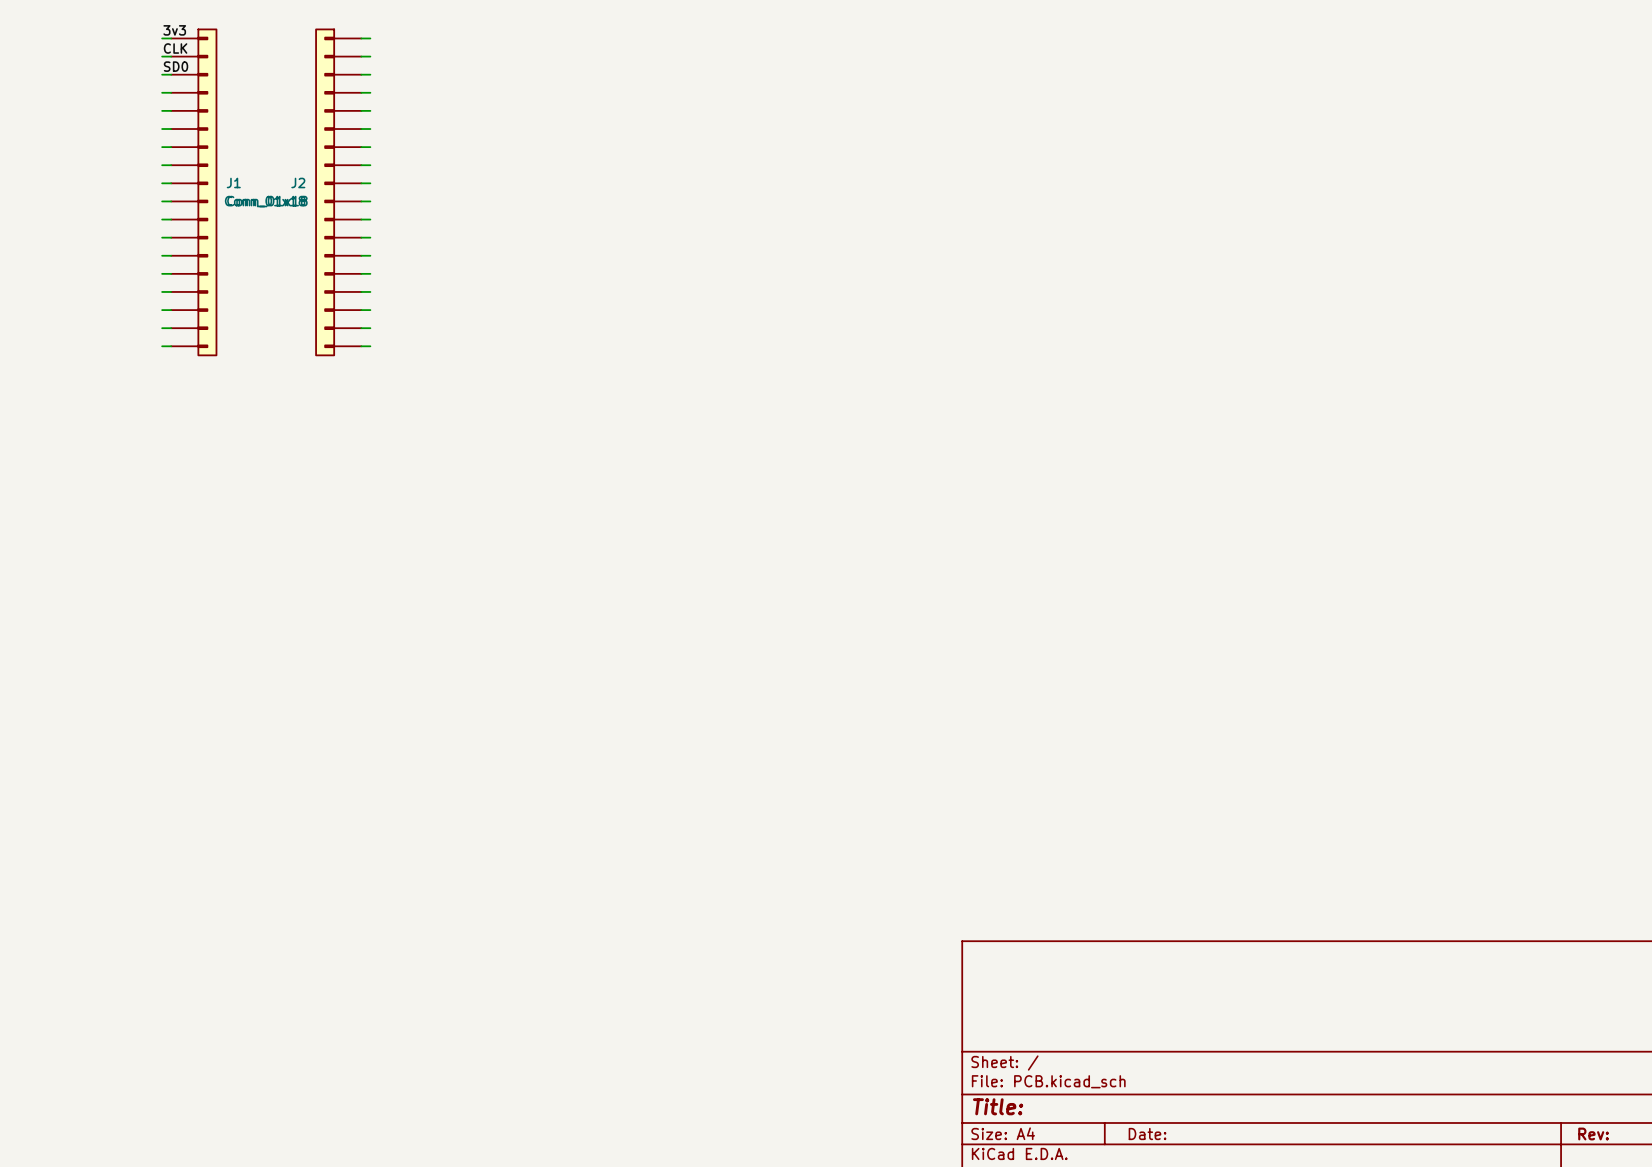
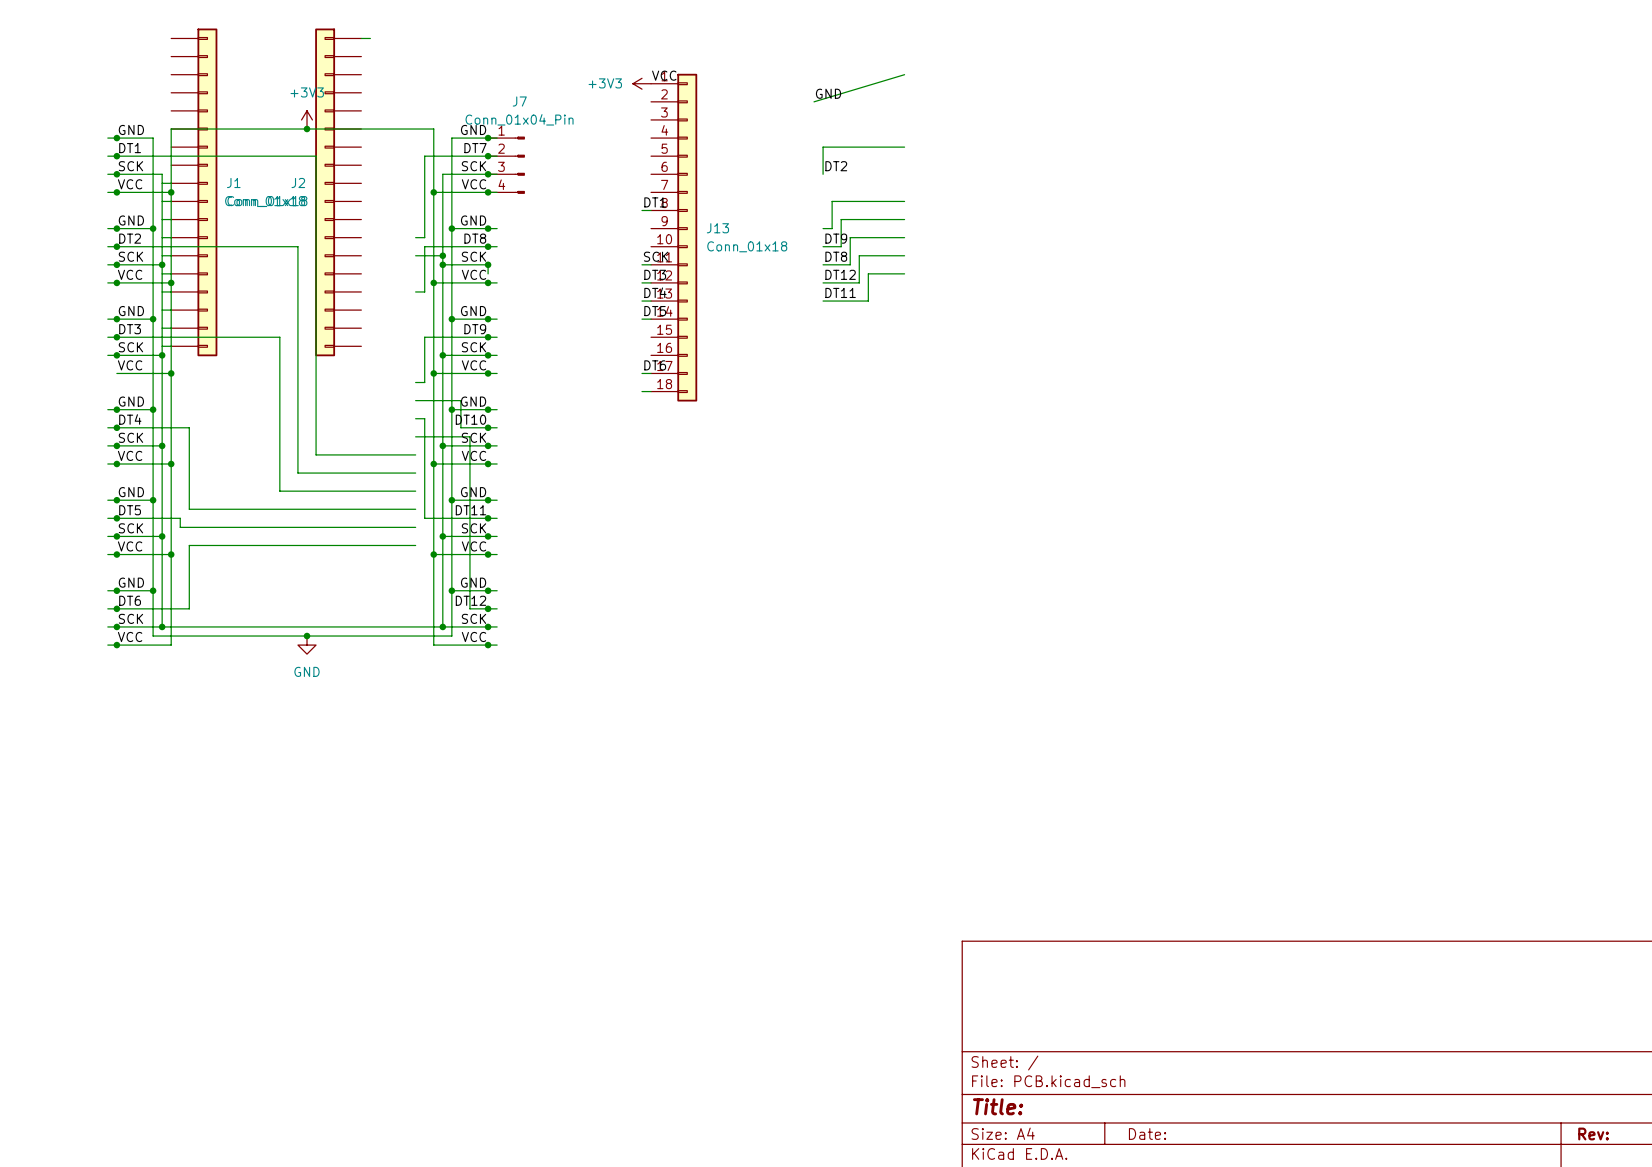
label: 3v3 (174, 30) -> none
wire: (162, 38) (171, 38) -> none
label: CLK (175, 48) -> none
wire: (162, 56) (171, 56) -> none
wire: (361, 56) (370, 56) -> none
label: SD0 (176, 66) -> none
wire: (162, 74) (171, 74) -> none
wire: (361, 74) (370, 74) -> none
wire: none -> (904, 74) (814, 101)
label: none -> VCC (664, 75)
power symbol: none -> +3V3 (641, 83)
wire: (162, 92) (171, 92) -> none
wire: (361, 92) (370, 92) -> none
label: none -> GND (828, 93)
wire: (162, 110) (171, 110) -> none
wire: (361, 110) (370, 110) -> none
power symbol: none -> +3V3 (307, 119)
label: none -> GND (131, 129)
wire: (162, 129) (171, 129) -> none
junction: none -> (307, 129)
wire: none -> (361, 129) (171, 129) (171, 645) (107, 645)
wire: none -> (370, 129) (433, 129) (433, 645) (497, 645)
label: none -> GND (473, 129)
wire: none -> (107, 138) (153, 138) (153, 636) (451, 636) (451, 138) (497, 138)
junction: none -> (116, 138)
junction: none -> (488, 138)
wire: (162, 147) (171, 147) -> none
wire: (361, 147) (370, 147) -> none
wire: none -> (904, 147) (823, 147) (823, 174)
label: none -> DT1 (130, 148)
label: none -> DT7 (475, 148)
wire: none -> (107, 156) (316, 156) (316, 454) (415, 454)
junction: none -> (116, 156)
junction: none -> (488, 156)
wire: none -> (497, 156) (424, 156) (424, 237) (415, 237)
wire: (162, 165) (171, 165) -> none
wire: (361, 165) (370, 165) -> none
J7: none -> Conn_01x04_Pin (506, 165)
label: none -> SCK (130, 166)
label: none -> SCK (474, 166)
label: none -> DT2 (836, 166)
wire: none -> (107, 174) (162, 174) (162, 626)
junction: none -> (116, 174)
junction: none -> (488, 174)
wire: none -> (497, 174) (442, 174) (442, 626)
wire: (361, 183) (370, 183) -> none
label: none -> VCC (130, 184)
label: none -> VCC (474, 184)
wire: none -> (107, 192) (171, 192)
junction: none -> (116, 192)
junction: none -> (171, 192)
wire: none -> (433, 192) (497, 192)
junction: none -> (433, 192)
junction: none -> (488, 192)
wire: (361, 201) (370, 201) -> none
wire: none -> (904, 201) (832, 201) (832, 228) (823, 228)
label: none -> DT1 (655, 202)
wire: none -> (641, 210) (651, 210)
wire: (361, 219) (370, 219) -> none
wire: none -> (904, 219) (841, 219) (841, 246) (823, 246)
label: none -> GND (131, 220)
label: none -> GND (473, 220)
wire: none -> (107, 228) (153, 228)
junction: none -> (116, 228)
junction: none -> (153, 228)
wire: none -> (451, 228) (497, 228)
junction: none -> (451, 228)
junction: none -> (488, 228)
wire: (361, 237) (370, 237) -> none
J13: none -> Conn_01x18 (674, 237)
wire: none -> (904, 237) (850, 237) (850, 264) (823, 264)
label: none -> DT2 (130, 238)
label: none -> DT8 (475, 238)
label: none -> DT9 (836, 238)
wire: none -> (107, 246) (297, 246) (297, 473) (415, 473)
junction: none -> (116, 246)
junction: none -> (488, 246)
wire: none -> (497, 246) (424, 246) (424, 291) (415, 291)
wire: (361, 255) (370, 255) -> none
wire: none -> (415, 255) (442, 255)
junction: none -> (442, 255)
wire: none -> (904, 255) (859, 255) (859, 282) (823, 282)
label: none -> SCK (130, 256)
label: none -> SCK (474, 256)
label: none -> SCK (656, 256)
label: none -> DT8 (836, 256)
wire: none -> (107, 264) (162, 264)
junction: none -> (116, 264)
junction: none -> (162, 264)
wire: none -> (442, 264) (488, 264) (488, 273)
junction: none -> (442, 264)
junction: none -> (488, 264)
wire: none -> (641, 264) (651, 264)
wire: (361, 273) (370, 273) -> none
wire: none -> (904, 273) (868, 273) (868, 301) (823, 301)
label: none -> VCC (130, 274)
label: none -> VCC (474, 274)
label: none -> DT3 (655, 274)
label: none -> DT12 (840, 274)
wire: none -> (107, 282) (171, 282)
junction: none -> (116, 282)
junction: none -> (171, 282)
wire: none -> (433, 282) (497, 282)
junction: none -> (433, 282)
junction: none -> (488, 282)
wire: none -> (641, 282) (651, 282)
wire: (361, 291) (370, 291) -> none
label: none -> DT4 (655, 292)
label: none -> DT11 (840, 292)
wire: none -> (641, 301) (651, 301)
wire: (361, 310) (370, 310) -> none
label: none -> GND (131, 311)
label: none -> GND (473, 311)
label: none -> DT5 (655, 311)
wire: none -> (107, 319) (153, 319)
junction: none -> (116, 319)
junction: none -> (153, 319)
wire: none -> (451, 319) (497, 319)
junction: none -> (451, 319)
junction: none -> (488, 319)
wire: none -> (641, 319) (651, 319)
wire: (361, 328) (370, 328) -> none
label: none -> DT3 (130, 329)
label: none -> DT9 (475, 329)
wire: none -> (107, 337) (279, 337) (279, 491) (415, 491)
junction: none -> (116, 337)
junction: none -> (488, 337)
wire: none -> (497, 337) (424, 337) (424, 382) (415, 382)
wire: (361, 346) (370, 346) -> none
label: none -> SCK (130, 347)
label: none -> SCK (474, 347)
wire: none -> (107, 355) (162, 355)
junction: none -> (116, 355)
junction: none -> (162, 355)
wire: none -> (442, 355) (497, 355)
junction: none -> (442, 355)
junction: none -> (488, 355)
label: none -> VCC (130, 365)
label: none -> VCC (474, 365)
label: none -> DT6 (655, 365)
wire: none -> (116, 373) (171, 373)
junction: none -> (171, 373)
wire: none -> (433, 373) (497, 373)
junction: none -> (433, 373)
junction: none -> (488, 373)
wire: none -> (641, 373) (651, 373)
wire: none -> (641, 391) (651, 391)
wire: none -> (415, 400) (460, 400) (460, 427) (497, 427)
label: none -> GND (131, 401)
label: none -> GND (473, 401)
wire: none -> (107, 409) (153, 409)
junction: none -> (116, 409)
junction: none -> (153, 409)
wire: none -> (451, 409) (497, 409)
junction: none -> (451, 409)
junction: none -> (488, 409)
wire: none -> (415, 418) (424, 418) (424, 518) (497, 518)
label: none -> DT4 (130, 419)
label: none -> DT10 (470, 419)
wire: none -> (107, 427) (189, 427) (189, 509) (415, 509)
junction: none -> (116, 427)
junction: none -> (488, 427)
wire: none -> (415, 436) (469, 436) (469, 608) (497, 608)
label: none -> SCK (130, 437)
label: none -> SCK (474, 437)
wire: none -> (107, 445) (162, 445)
junction: none -> (116, 445)
junction: none -> (162, 445)
wire: none -> (442, 445) (497, 445)
junction: none -> (442, 445)
junction: none -> (488, 445)
label: none -> VCC (130, 455)
label: none -> VCC (474, 455)
wire: none -> (107, 463) (171, 463)
junction: none -> (116, 463)
junction: none -> (171, 463)
wire: none -> (433, 463) (497, 463)
junction: none -> (433, 463)
junction: none -> (488, 463)
label: none -> GND (131, 492)
label: none -> GND (473, 492)
wire: none -> (107, 500) (153, 500)
junction: none -> (116, 500)
junction: none -> (153, 500)
wire: none -> (451, 500) (497, 500)
junction: none -> (451, 500)
junction: none -> (488, 500)
label: none -> DT5 (130, 510)
label: none -> DT11 (470, 510)
wire: none -> (107, 518) (180, 518) (180, 527) (415, 527)
junction: none -> (116, 518)
junction: none -> (488, 518)
label: none -> SCK (130, 528)
label: none -> SCK (474, 528)
wire: none -> (107, 536) (162, 536)
junction: none -> (116, 536)
junction: none -> (162, 536)
wire: none -> (442, 536) (497, 536)
junction: none -> (442, 536)
junction: none -> (488, 536)
wire: none -> (415, 545) (189, 545) (189, 608) (107, 608)
label: none -> VCC (130, 546)
label: none -> VCC (474, 546)
wire: none -> (107, 554) (171, 554)
junction: none -> (116, 554)
junction: none -> (171, 554)
wire: none -> (433, 554) (497, 554)
junction: none -> (433, 554)
junction: none -> (488, 554)
label: none -> GND (131, 582)
label: none -> GND (473, 582)
wire: none -> (107, 590) (153, 590)
junction: none -> (116, 590)
junction: none -> (153, 590)
wire: none -> (451, 590) (497, 590)
junction: none -> (451, 590)
junction: none -> (488, 590)
label: none -> DT6 (130, 600)
label: none -> DT12 (470, 600)
junction: none -> (116, 608)
junction: none -> (488, 608)
label: none -> SCK (130, 618)
label: none -> SCK (474, 618)
wire: none -> (107, 626) (497, 626)
junction: none -> (116, 626)
junction: none -> (162, 626)
junction: none -> (442, 626)
junction: none -> (488, 626)
label: none -> VCC (130, 636)
junction: none -> (307, 636)
label: none -> VCC (474, 636)
junction: none -> (116, 645)
power symbol: none -> GND (307, 645)
junction: none -> (488, 645)

